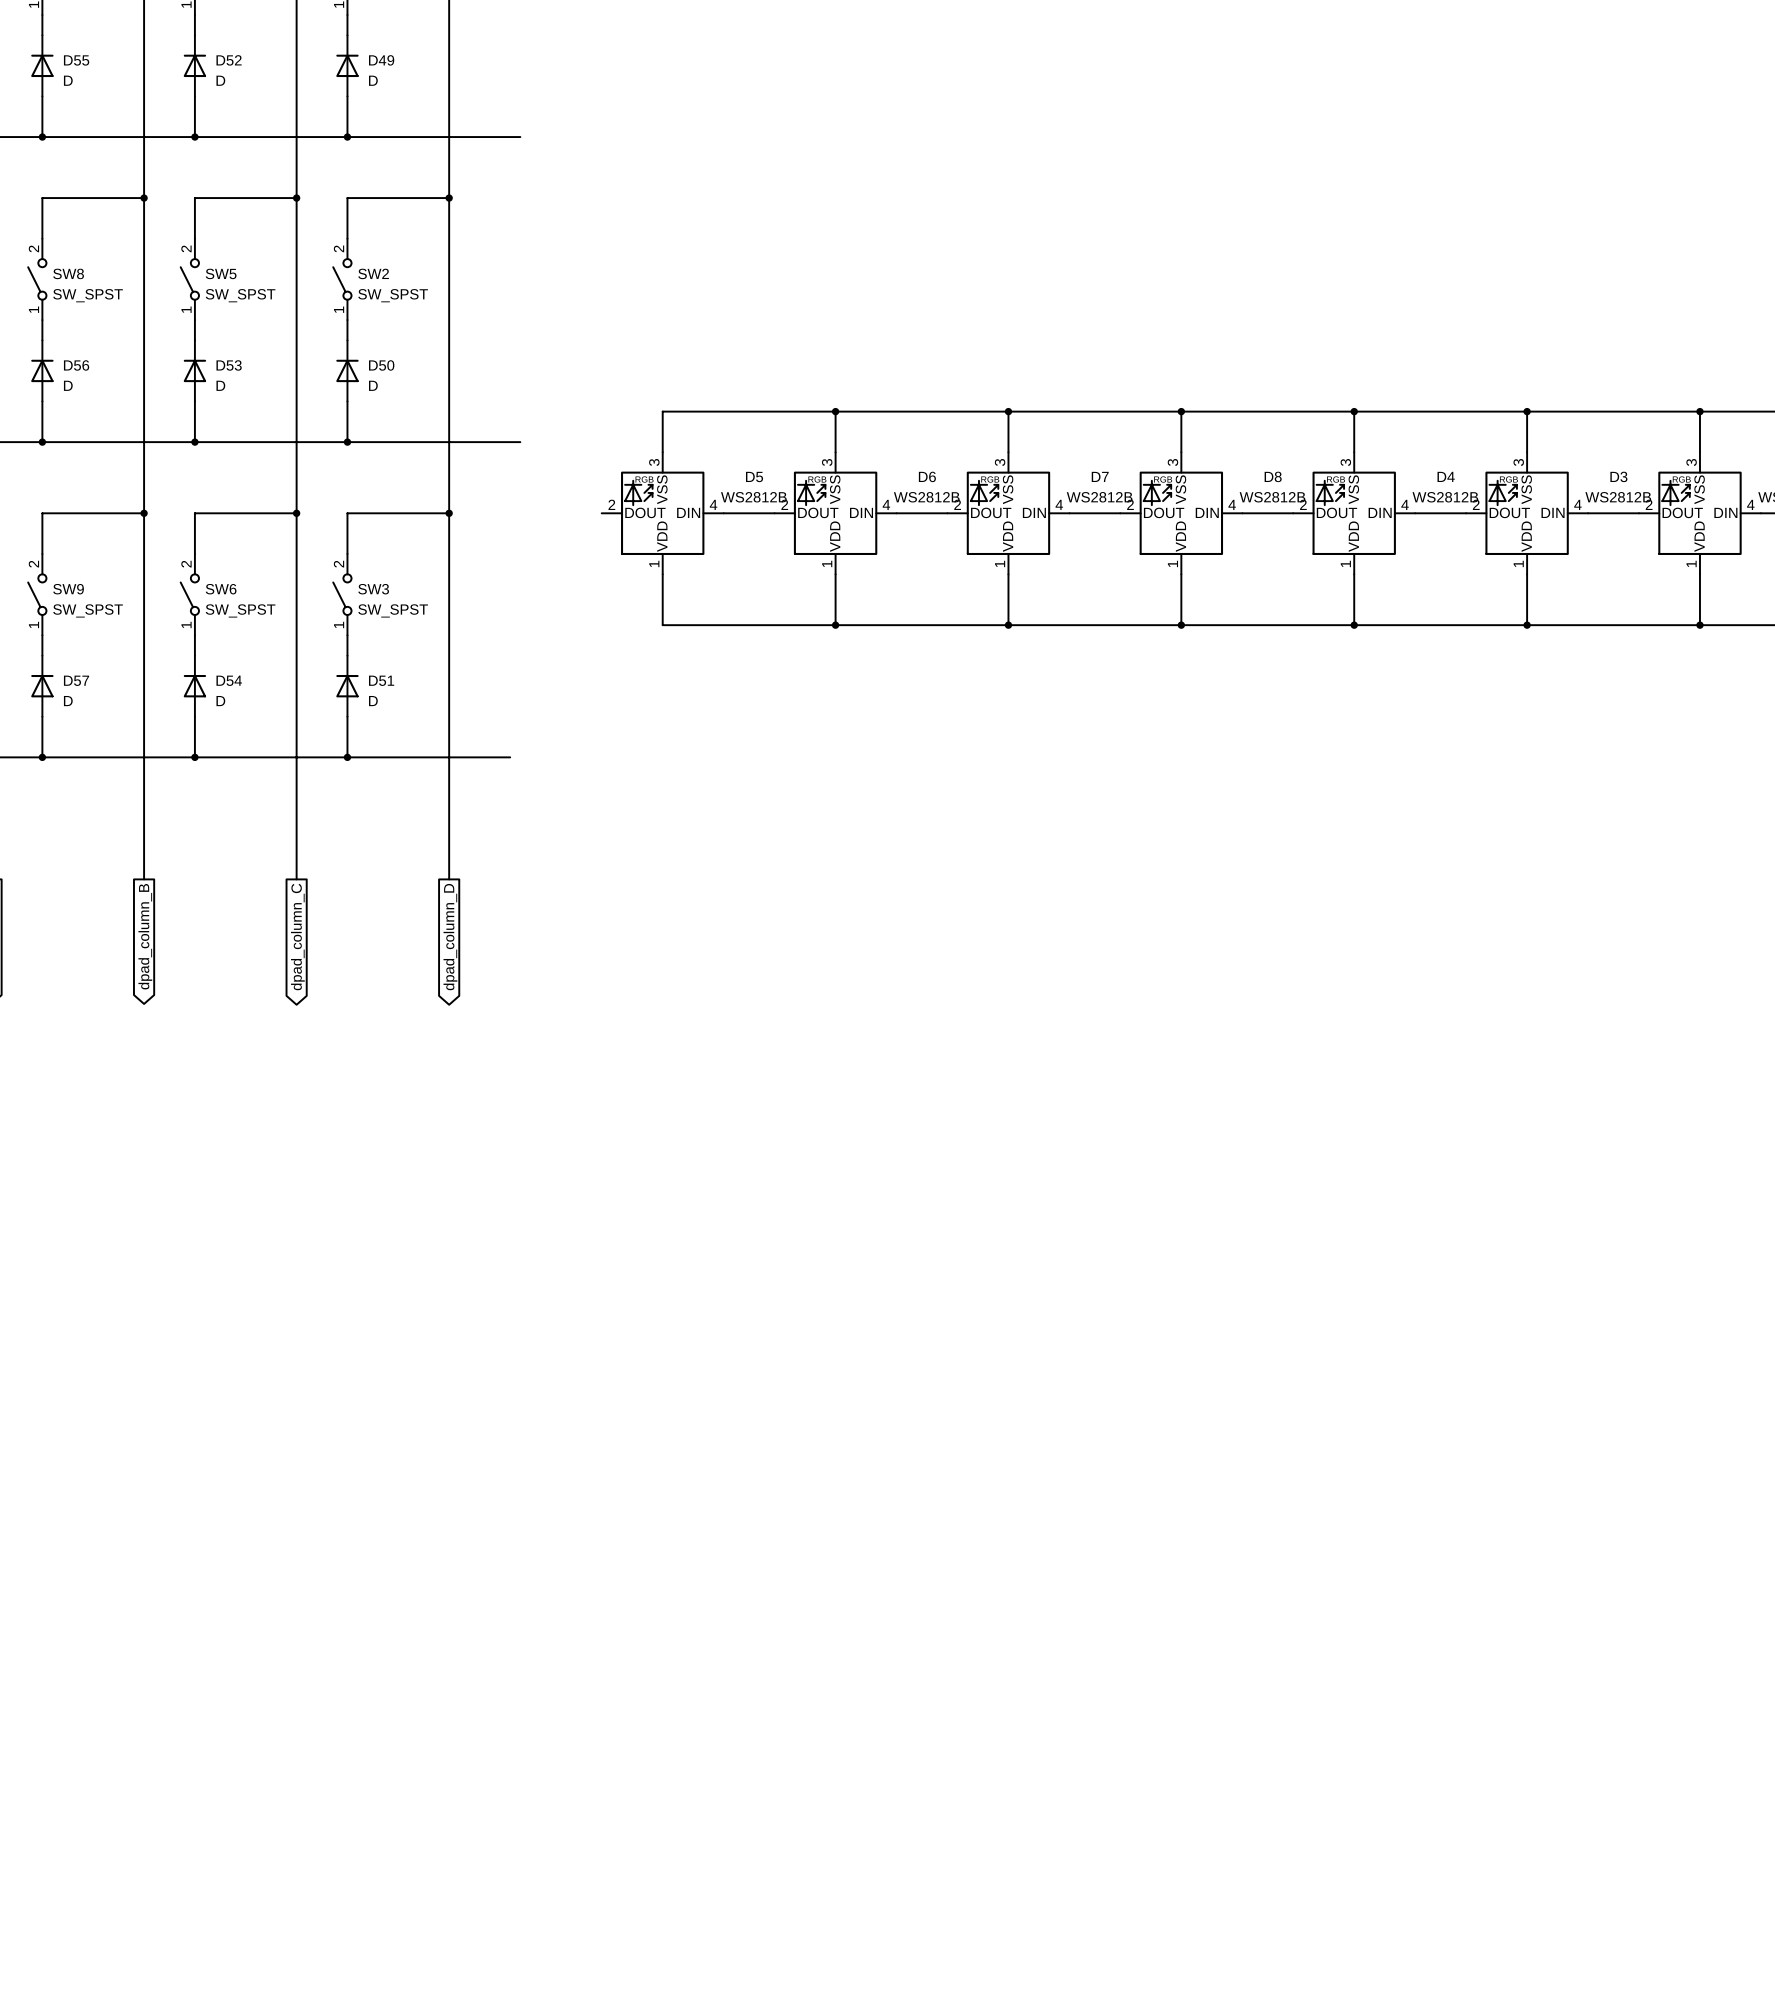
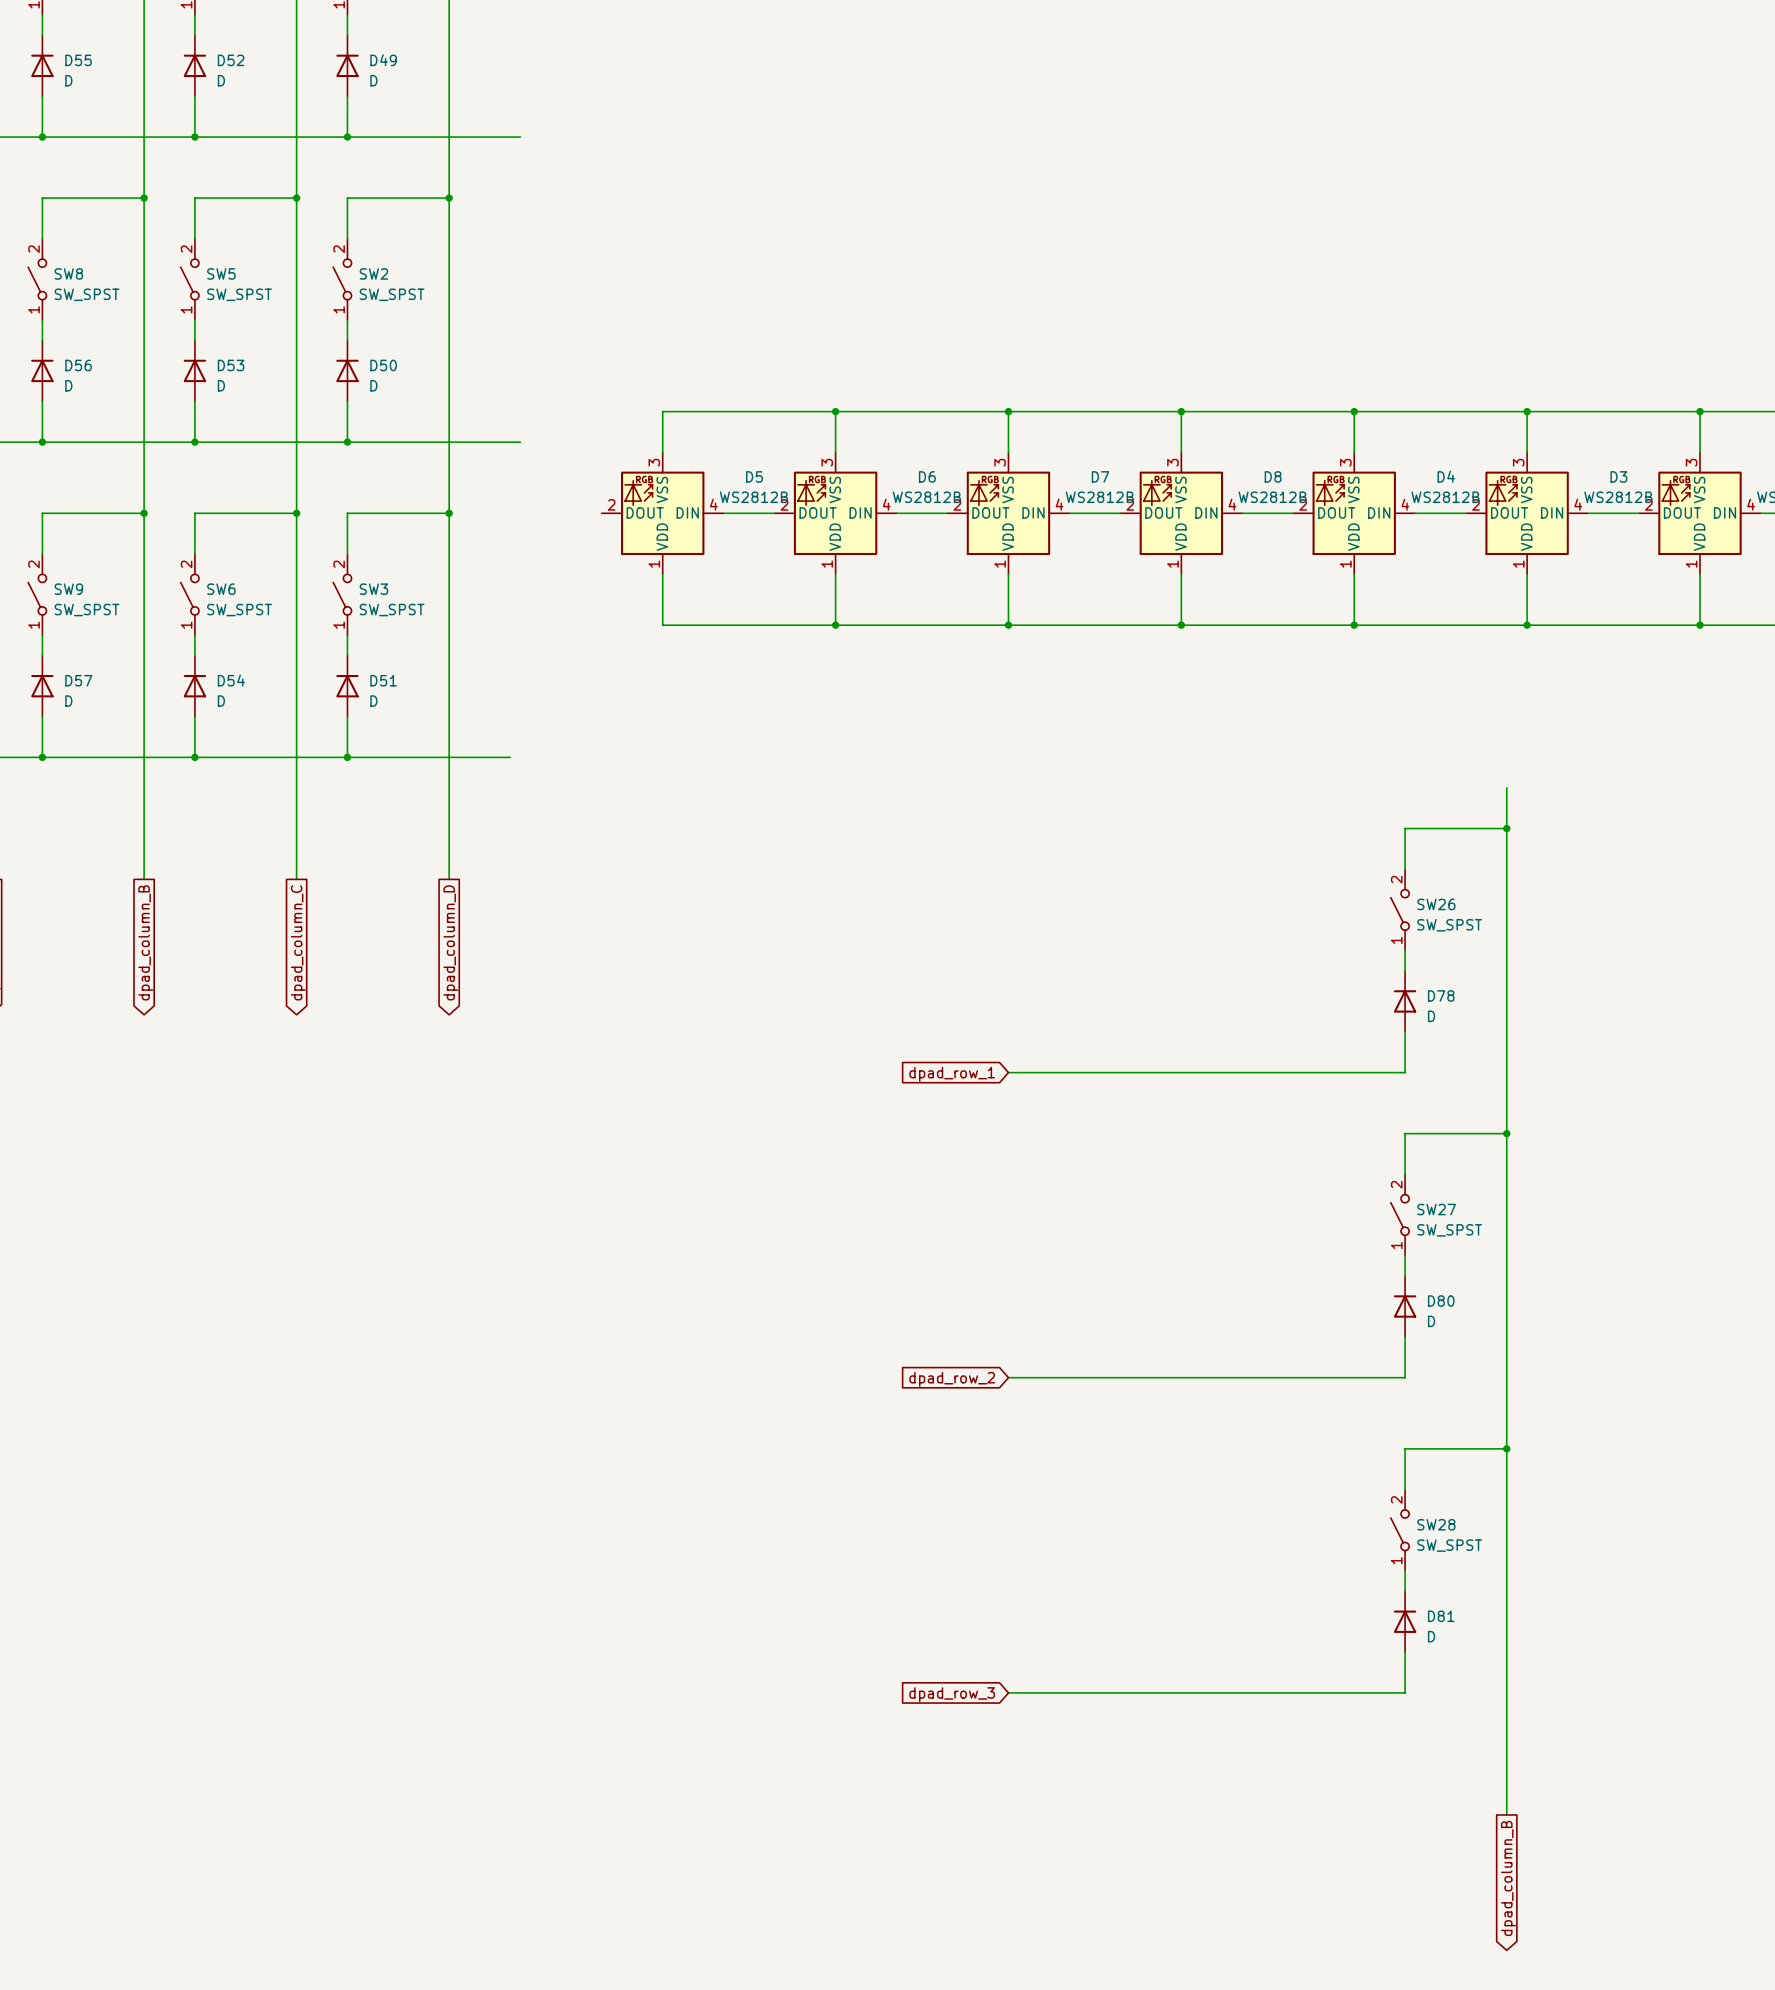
wire: none -> (1506, 787) (1506, 1814)
wire: none -> (1506, 828) (1405, 828) (1405, 869)
junction: none -> (1506, 828)
SW26: none -> SW_SPST (1399, 909)
wire: none -> (1405, 950) (1405, 970)
D78: none -> D (1405, 1001)
wire: none -> (1405, 1031) (1405, 1072) (1008, 1072)
global label: none -> dpad_row_1 (952, 1074)
wire: none -> (1506, 1133) (1405, 1133) (1405, 1174)
junction: none -> (1506, 1133)
SW27: none -> SW_SPST (1399, 1214)
wire: none -> (1405, 1255) (1405, 1276)
D80: none -> D (1405, 1306)
wire: none -> (1405, 1337) (1405, 1377) (1008, 1377)
global label: none -> dpad_row_2 (952, 1379)
wire: none -> (1506, 1448) (1405, 1448) (1405, 1489)
junction: none -> (1506, 1448)
SW28: none -> SW_SPST (1399, 1530)
wire: none -> (1405, 1570) (1405, 1591)
D81: none -> D (1405, 1621)
wire: none -> (1405, 1652) (1405, 1692) (1008, 1692)
global label: none -> dpad_row_3 (952, 1694)
global label: none -> dpad_column_B (1508, 1878)

